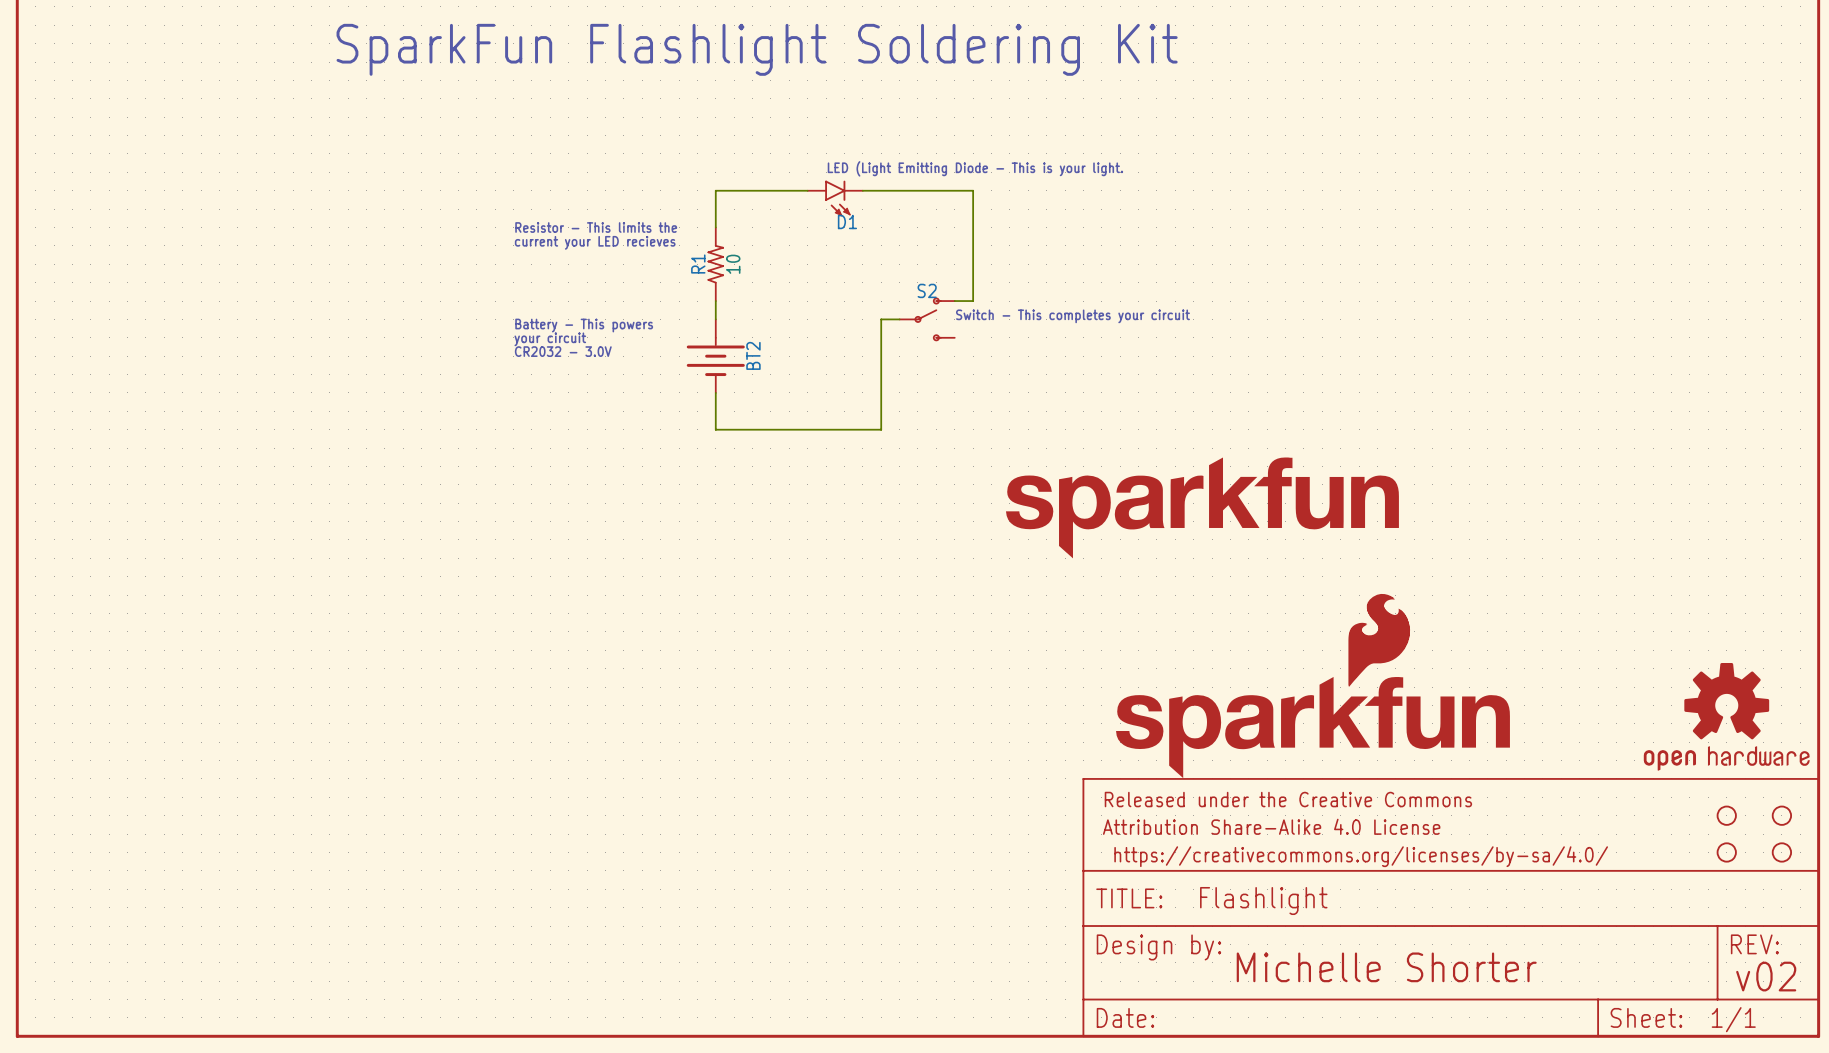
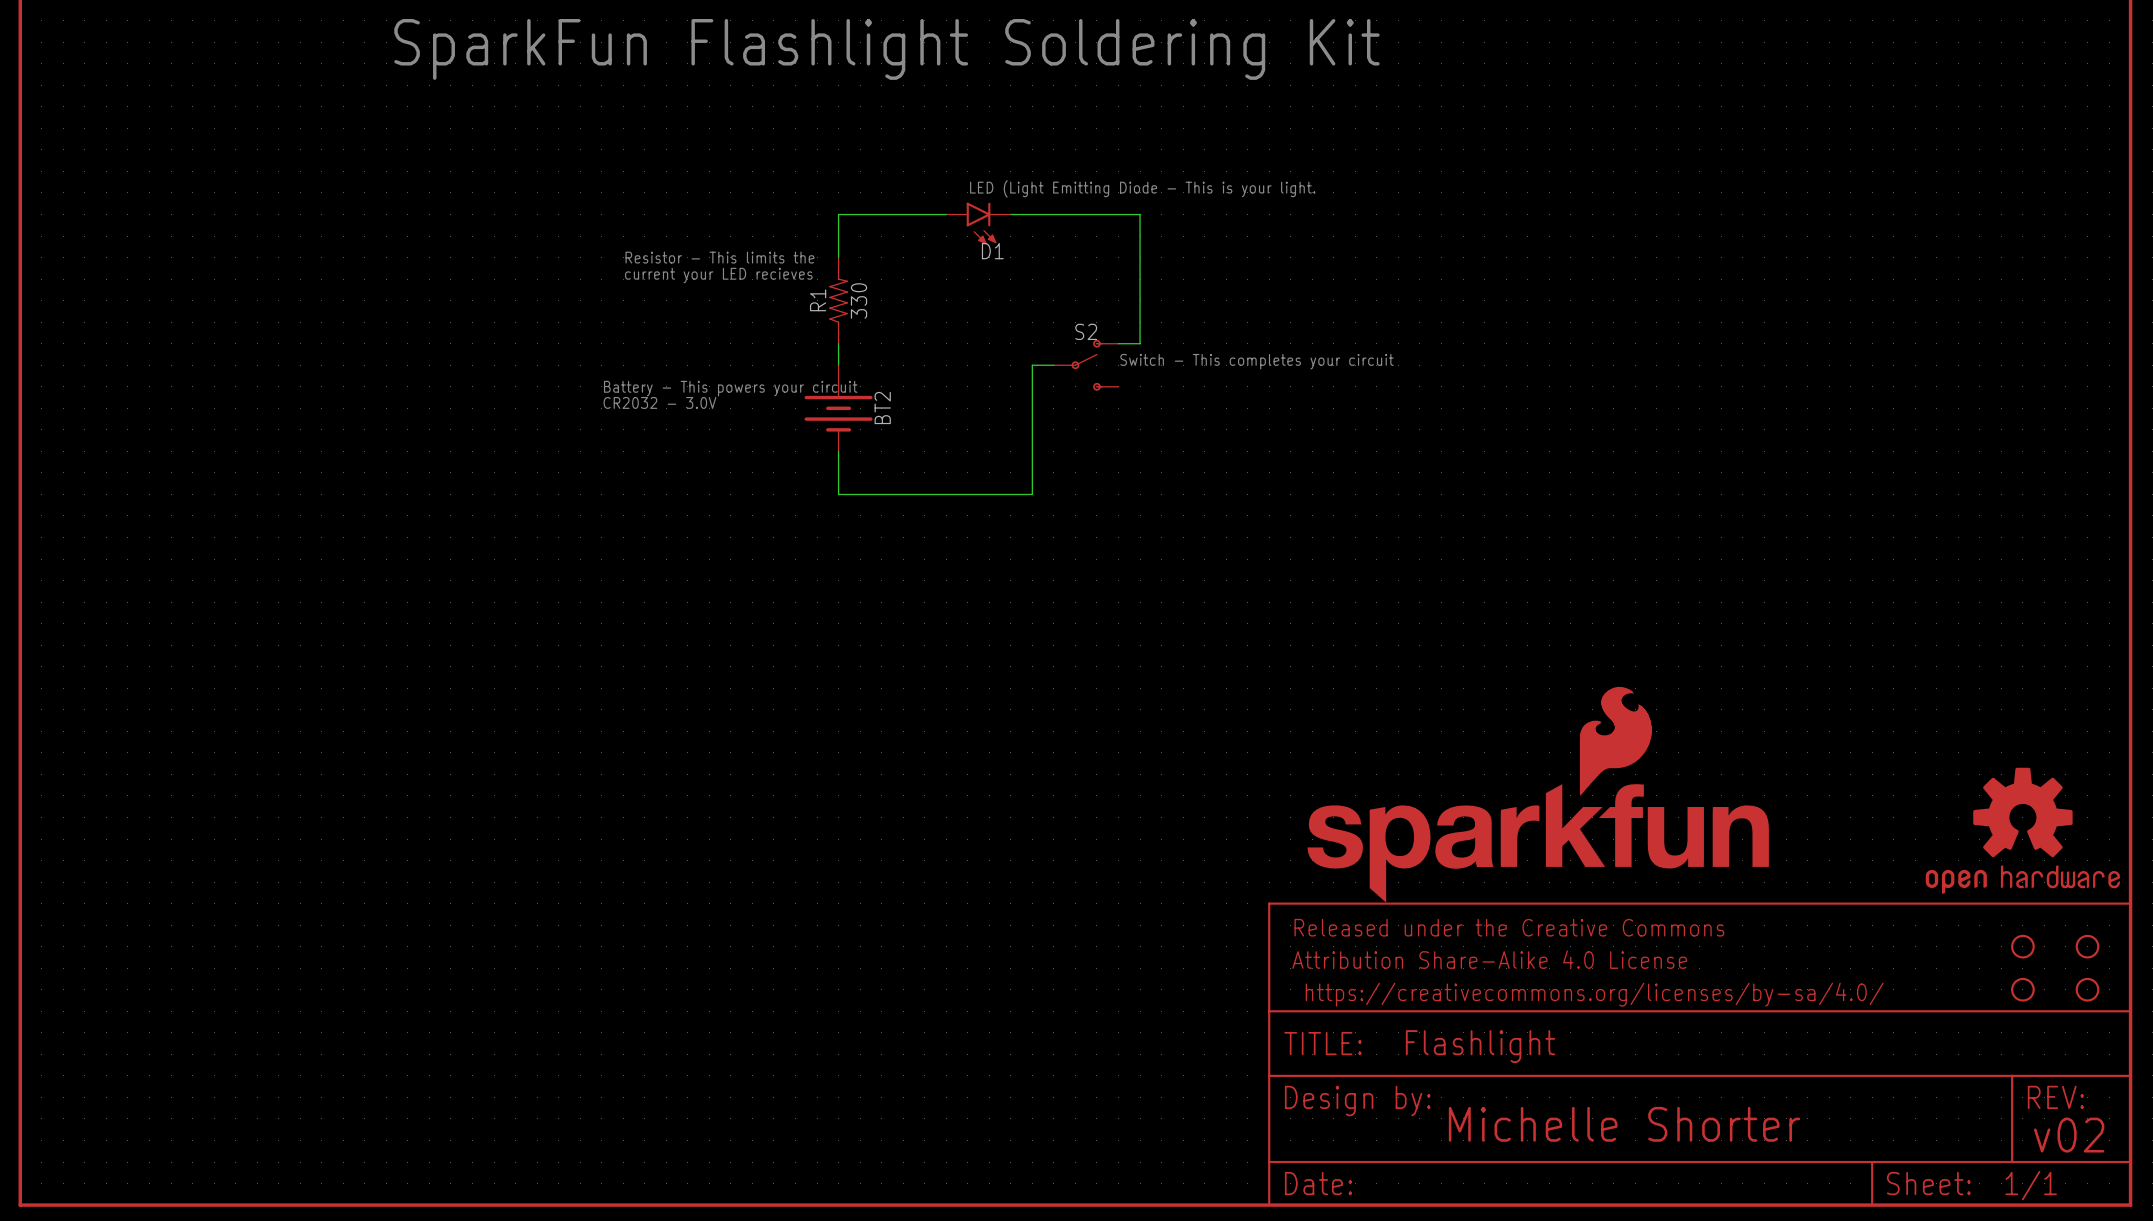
text position: Resistor - This limits the (596, 227) -> Resistor - This limits the (720, 257)
text position: current your LED recieves (595, 242) -> current your LED recieves (718, 275)
R1 value: 10 (733, 264) -> 330 (859, 300)
text: Battery - This powers (584, 325) -> none
text: your circuit (550, 339) -> Battery - This powers your circuit (730, 388)
part: (1202, 507) -> none

